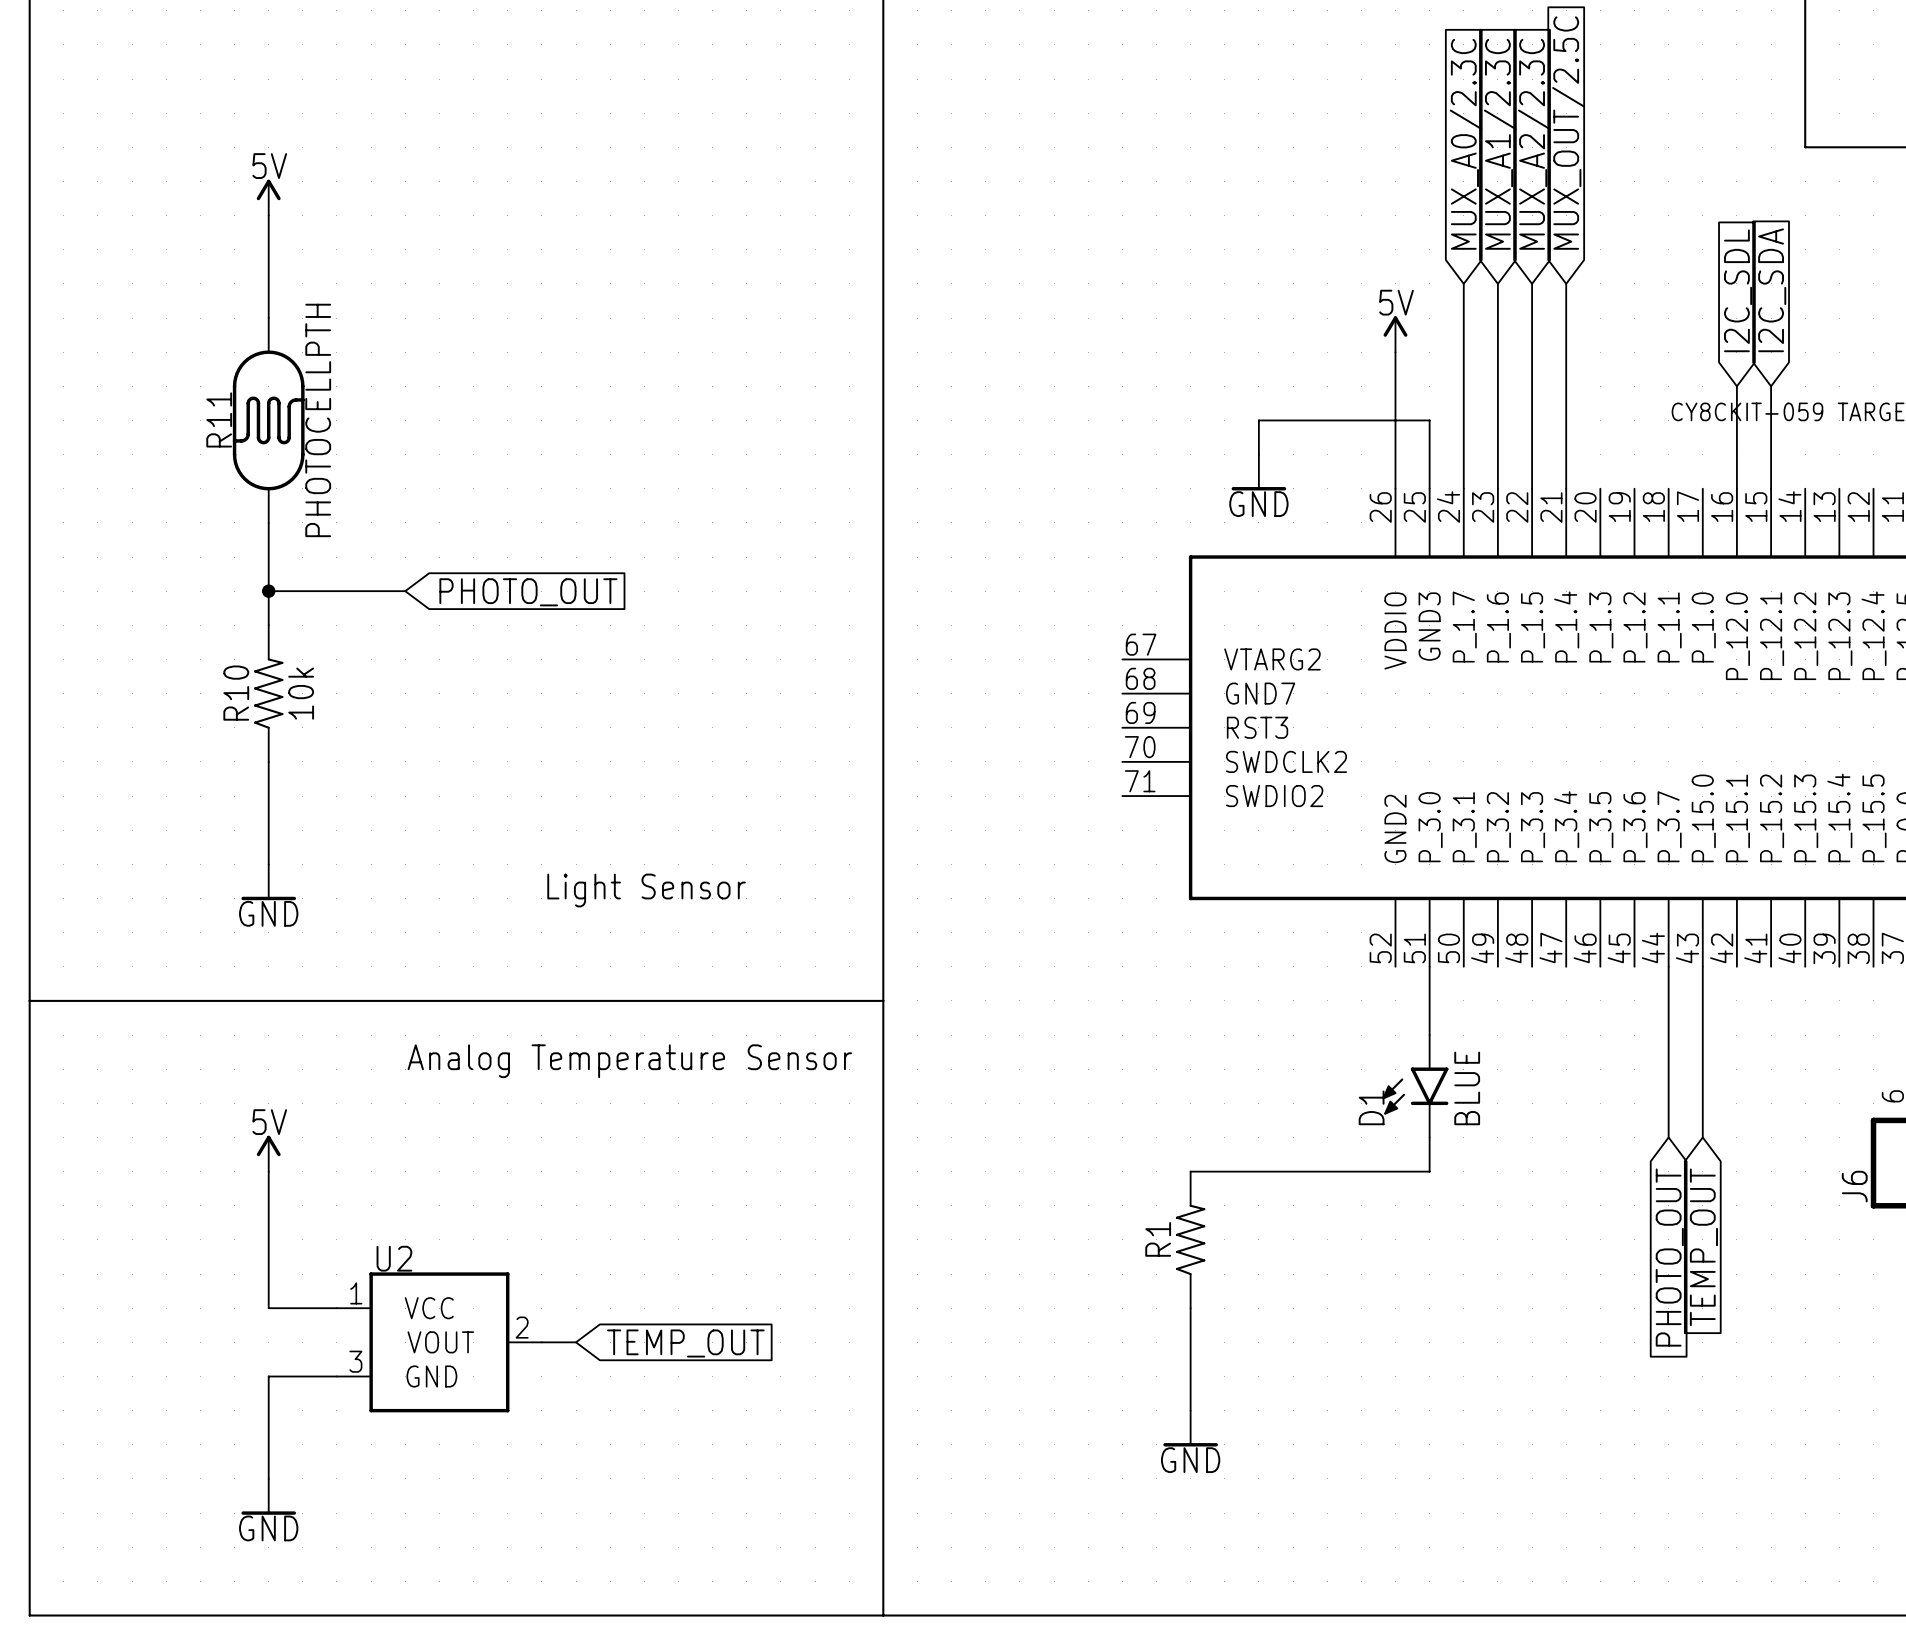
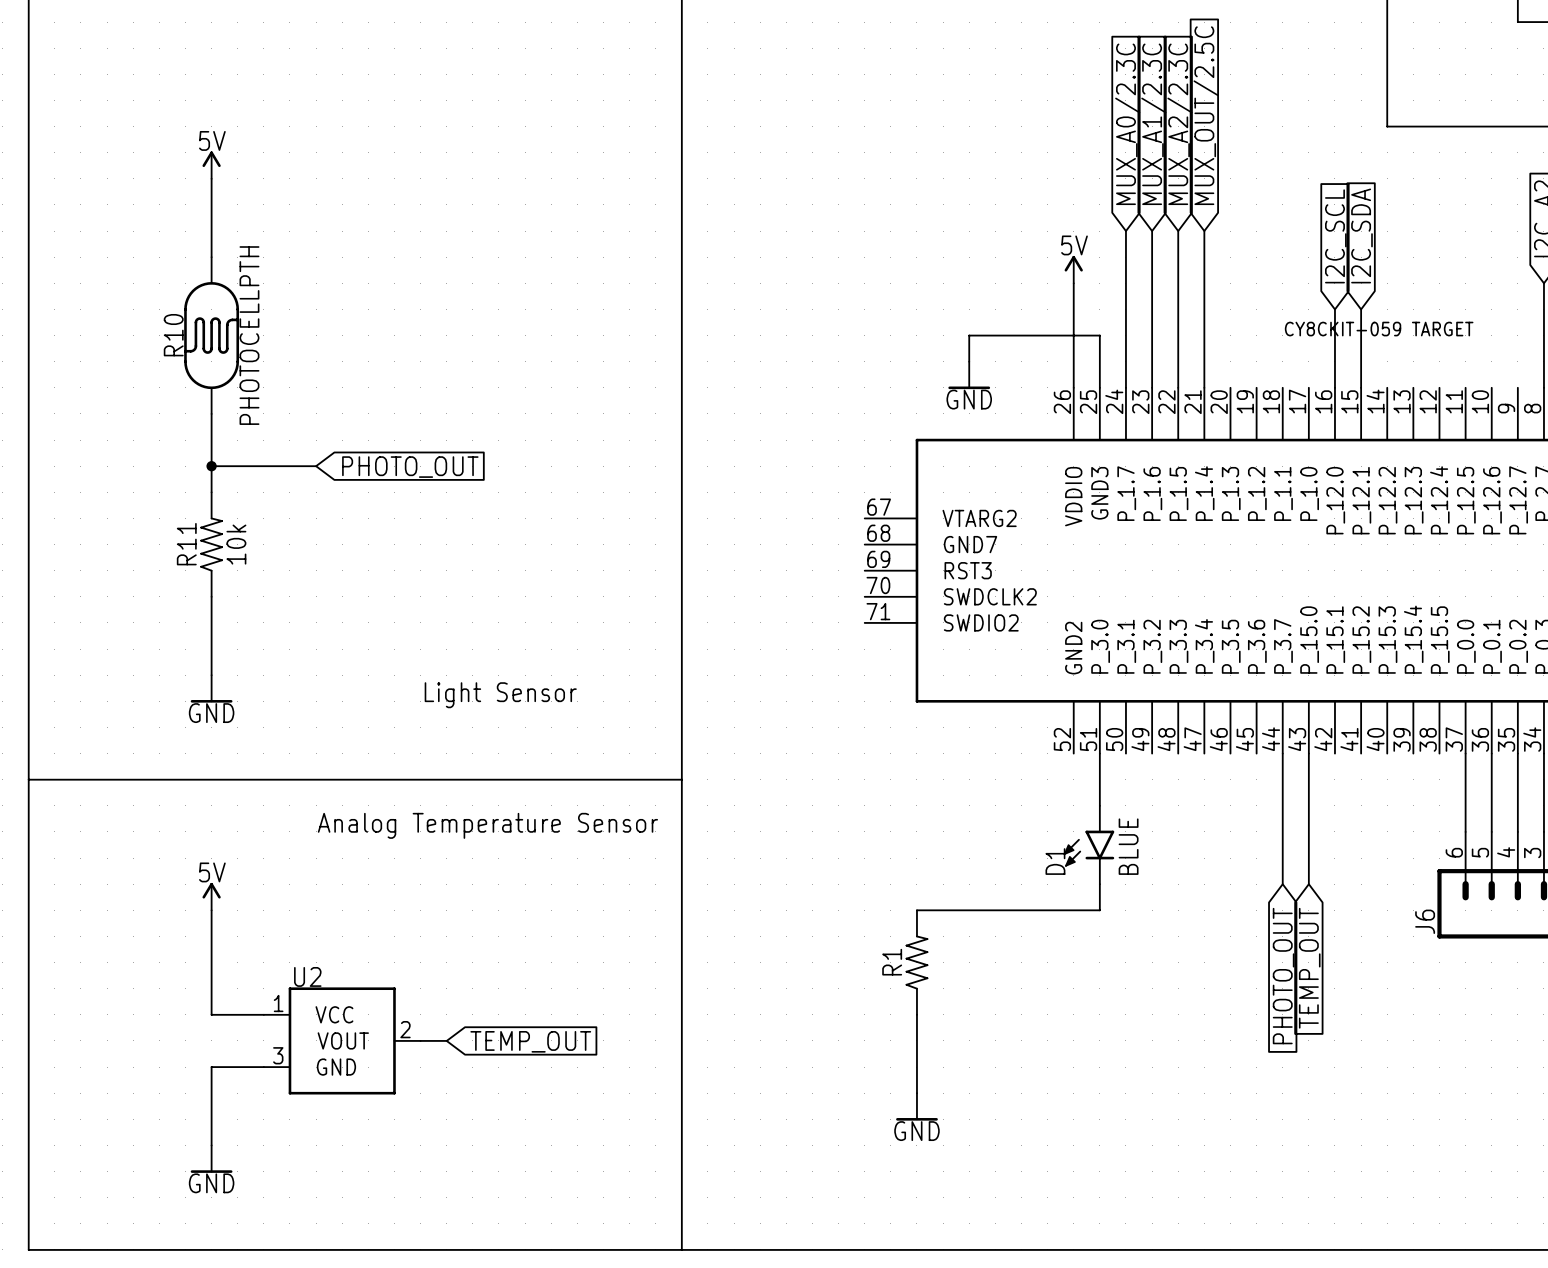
global label: I2C_SDL (1738, 290) -> I2C_SCL (1335, 236)
R11 name: R11 (219, 419) -> R10 (173, 335)
R10 name: R10 (236, 693) -> R11 (186, 544)

